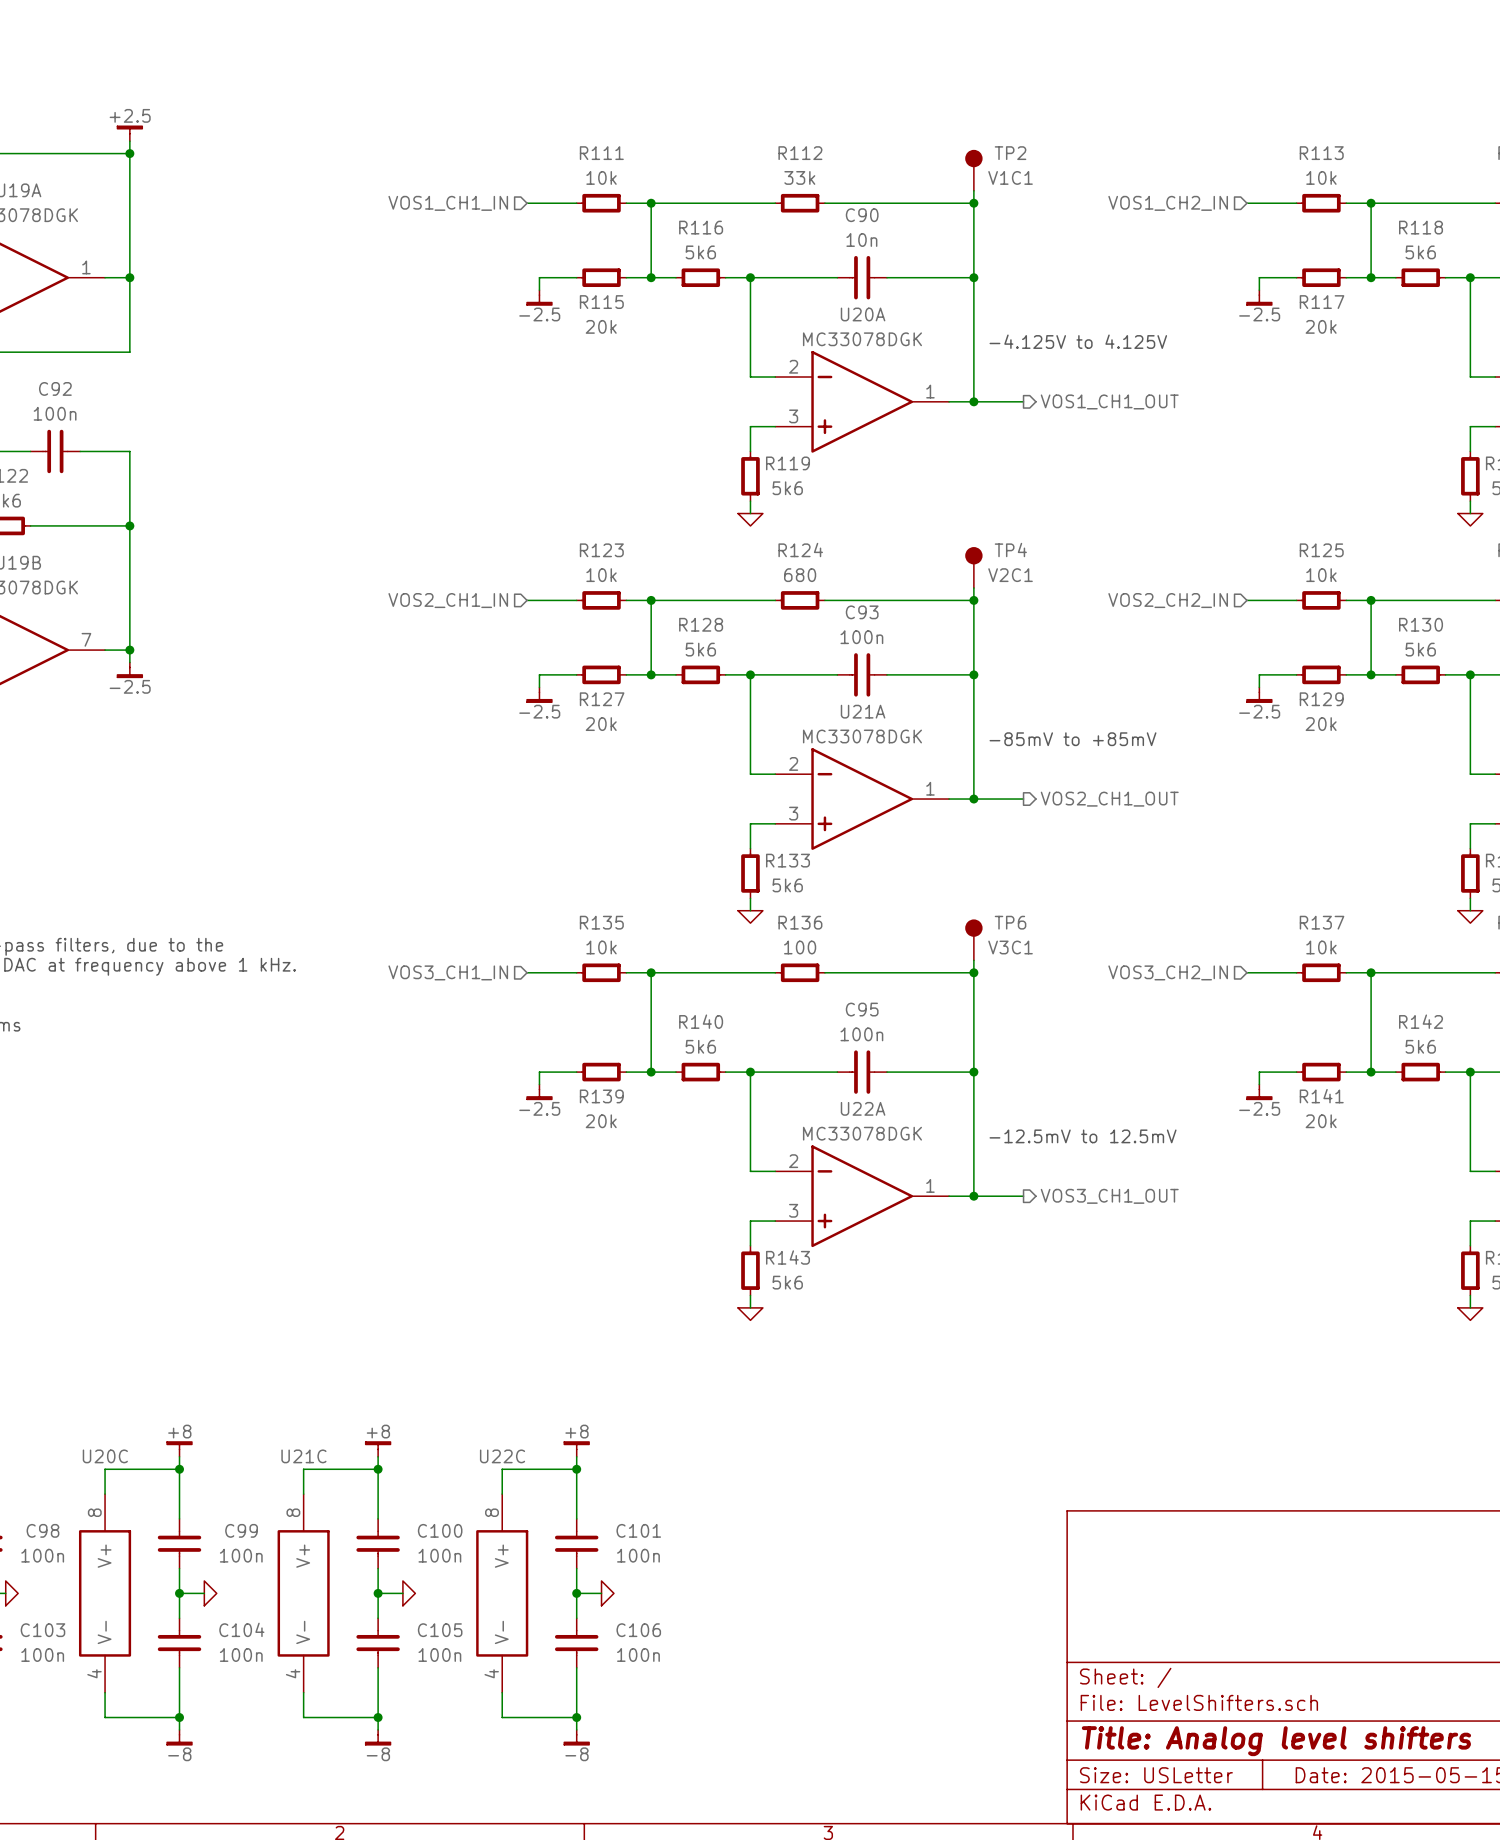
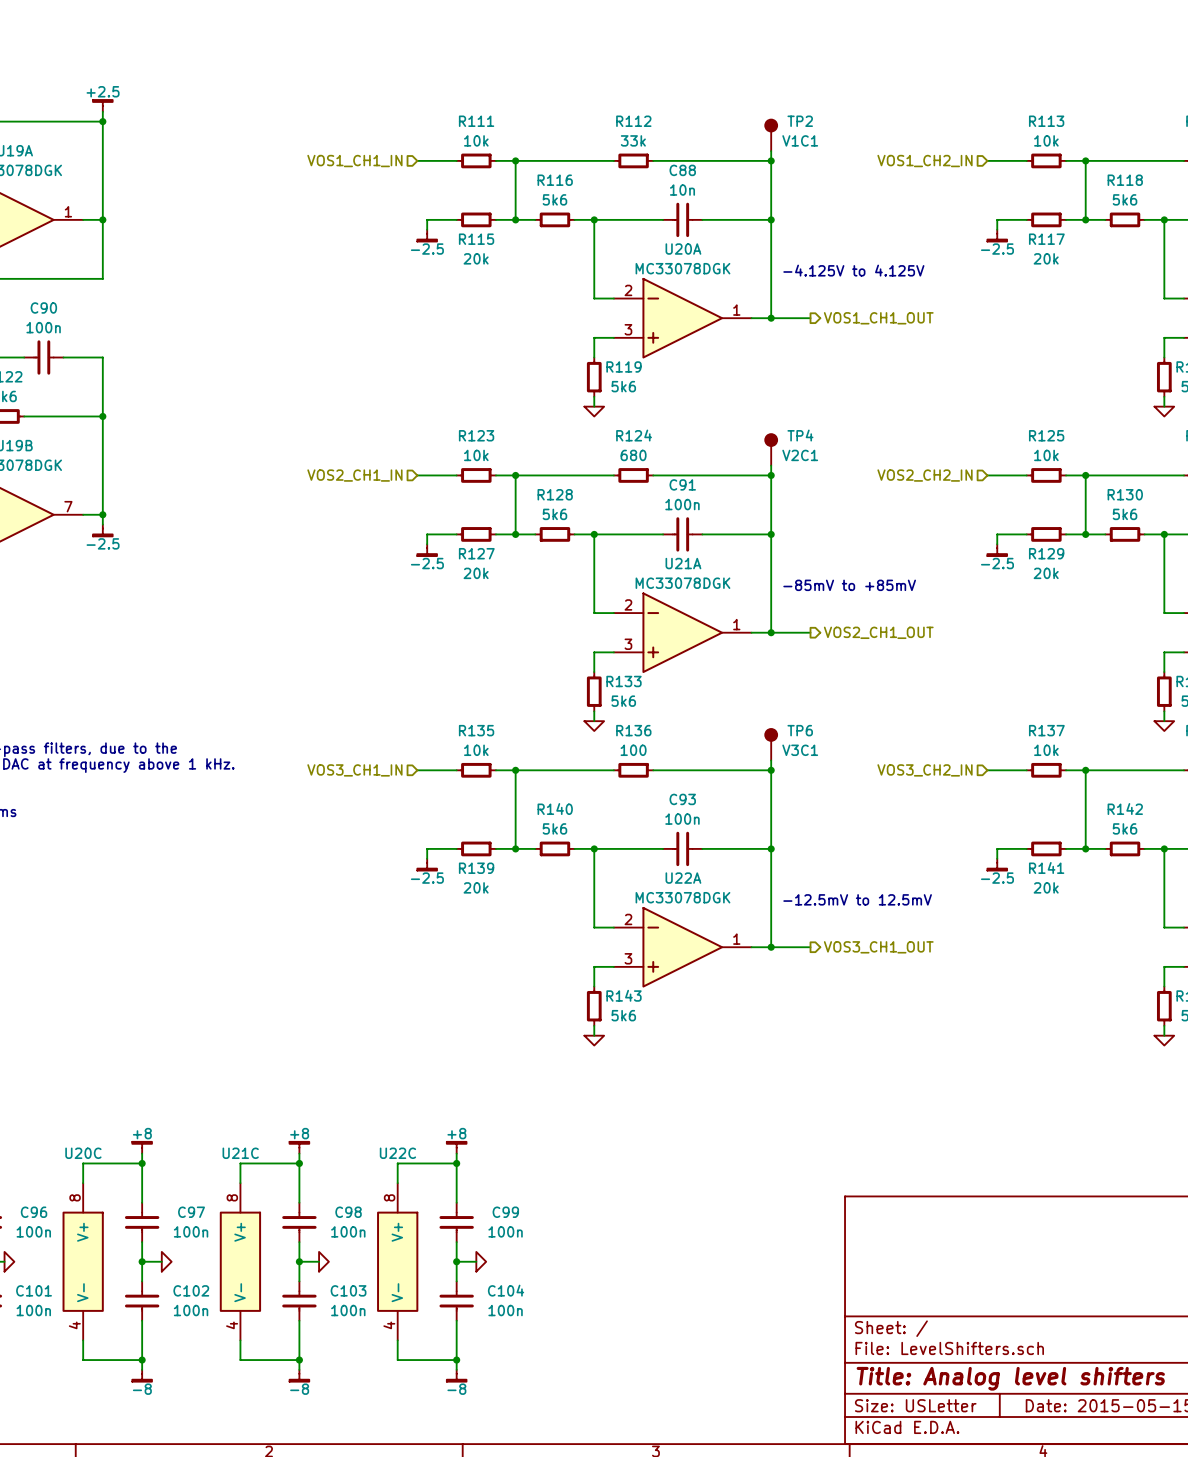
C90 name: C90 (862, 215) -> C88 (682, 170)
C92 name: C92 (55, 388) -> C90 (43, 307)
C93 name: C93 (862, 612) -> C91 (682, 484)
C95 name: C95 (862, 1009) -> C93 (682, 799)
C98 name: C98 (42, 1530) -> C96 (34, 1212)
C99 name: C99 (241, 1530) -> C97 (191, 1212)
C100 name: C100 (440, 1530) -> C98 (348, 1212)
C101 name: C101 (638, 1530) -> C99 (505, 1212)
C104 name: C104 (241, 1629) -> C102 (191, 1290)
C103 name: C103 (42, 1630) -> C101 (34, 1290)
C105 name: C105 (440, 1630) -> C103 (348, 1290)
C106 name: C106 (638, 1630) -> C104 (506, 1290)

